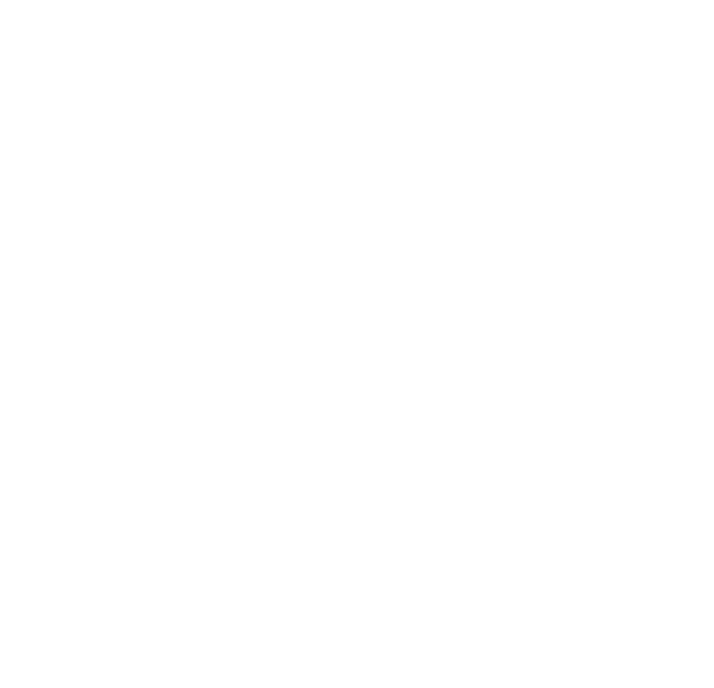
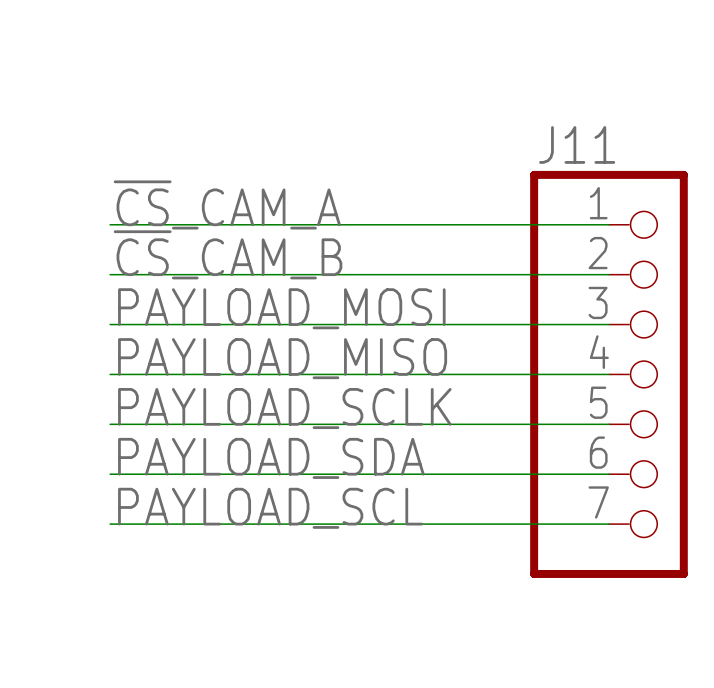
label: none -> ~{CS}_CAM_A (227, 204)
wire: none -> (110, 224) (608, 224)
label: none -> ~{CS}_CAM_B (228, 254)
wire: none -> (110, 274) (608, 274)
label: none -> PAYLOAD_MOSI (281, 308)
wire: none -> (110, 324) (608, 324)
label: none -> PAYLOAD_MISO (282, 358)
wire: none -> (110, 374) (608, 374)
J11: none -> (608, 374)
label: none -> PAYLOAD_SCLK (284, 408)
wire: none -> (110, 424) (608, 424)
label: none -> PAYLOAD_SDA (271, 458)
wire: none -> (110, 474) (608, 474)
label: none -> PAYLOAD_SCL (270, 508)
wire: none -> (110, 524) (608, 524)

